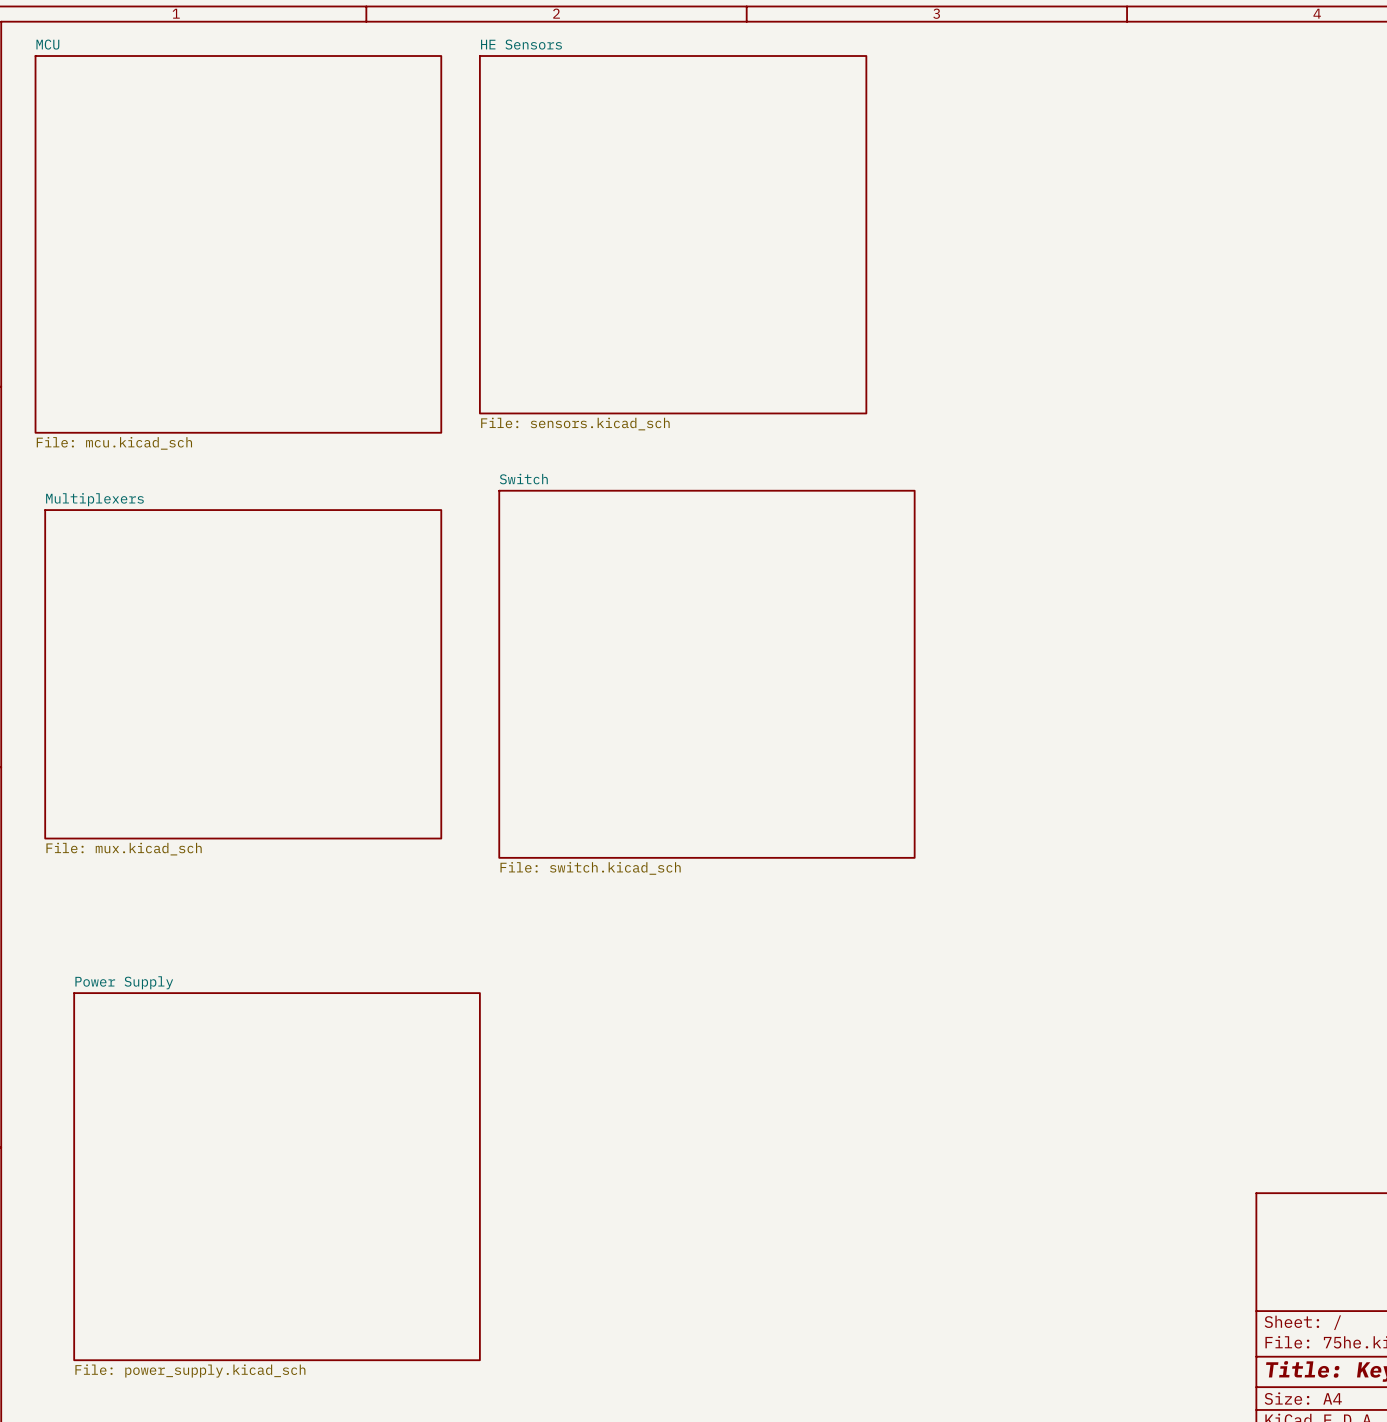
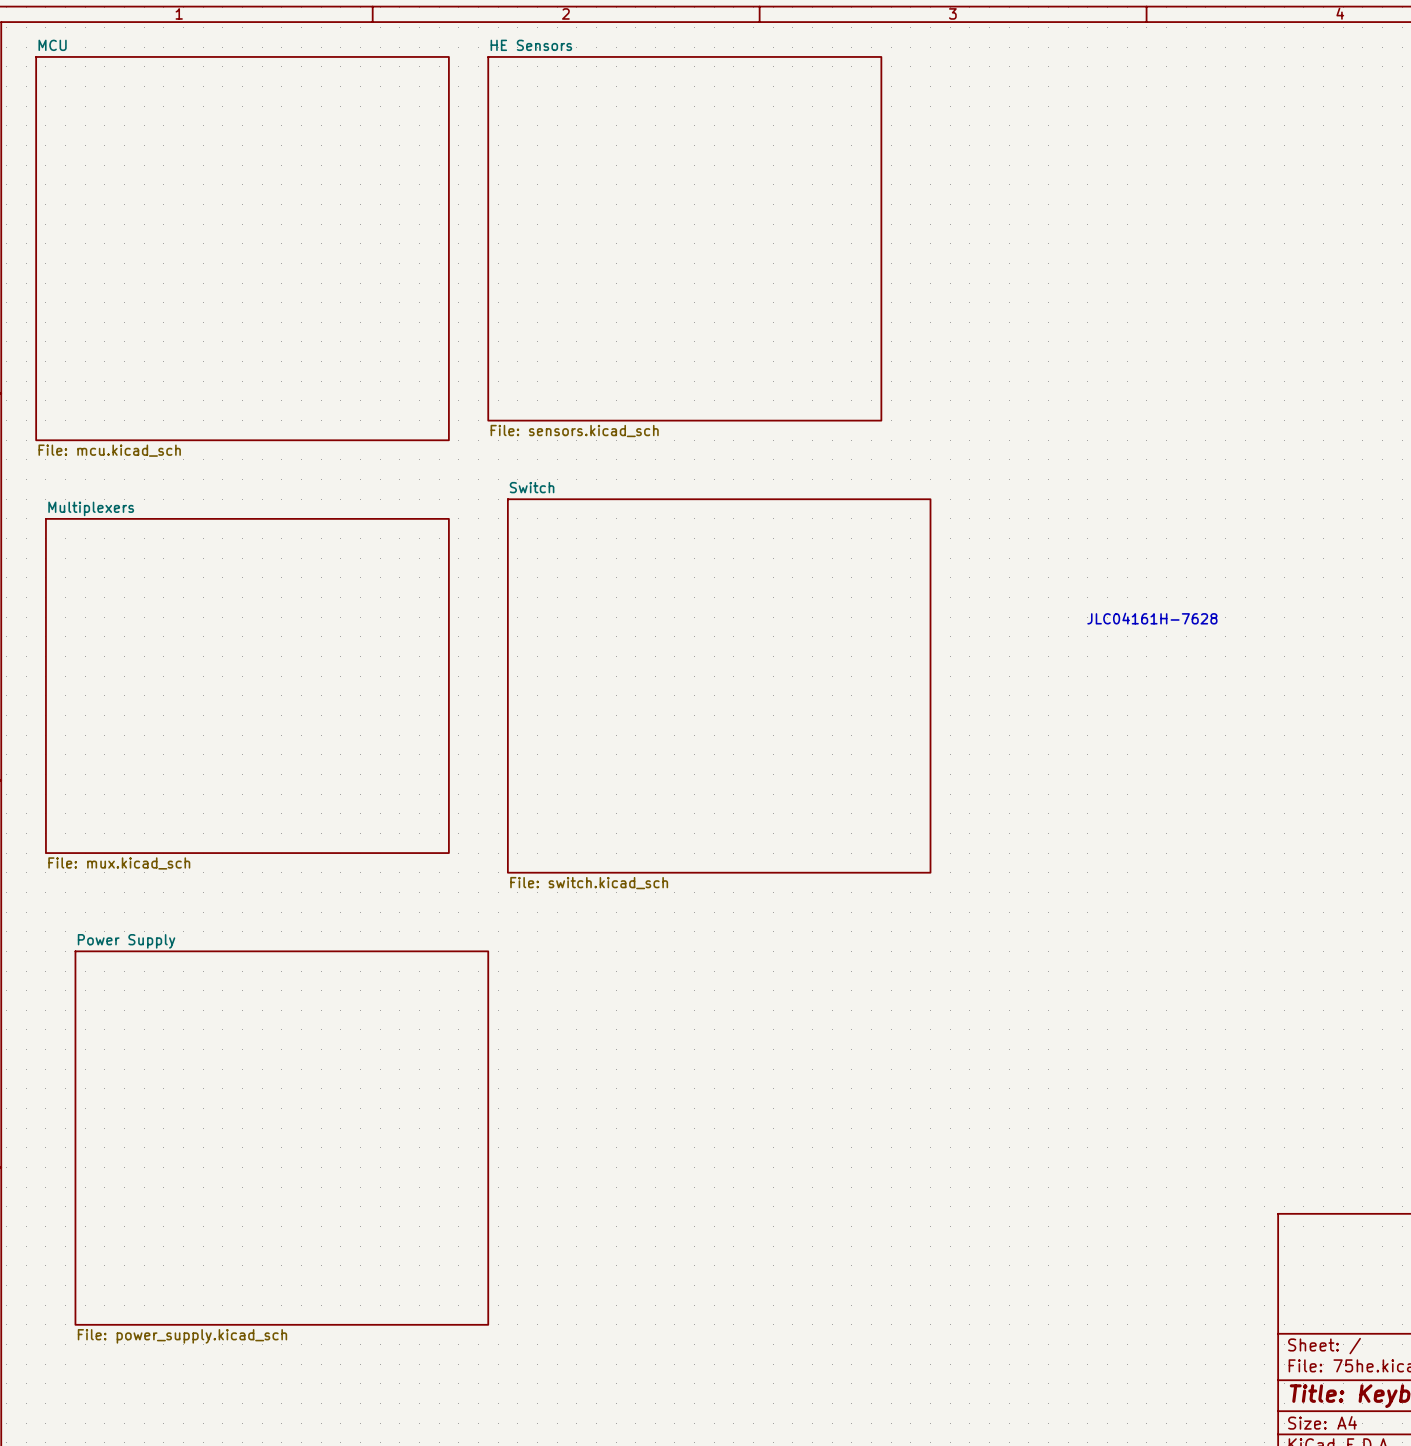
text: none -> JLC04161H-7628 (1152, 618)
sheet Power Supply position: (277, 1176) -> (281, 1138)

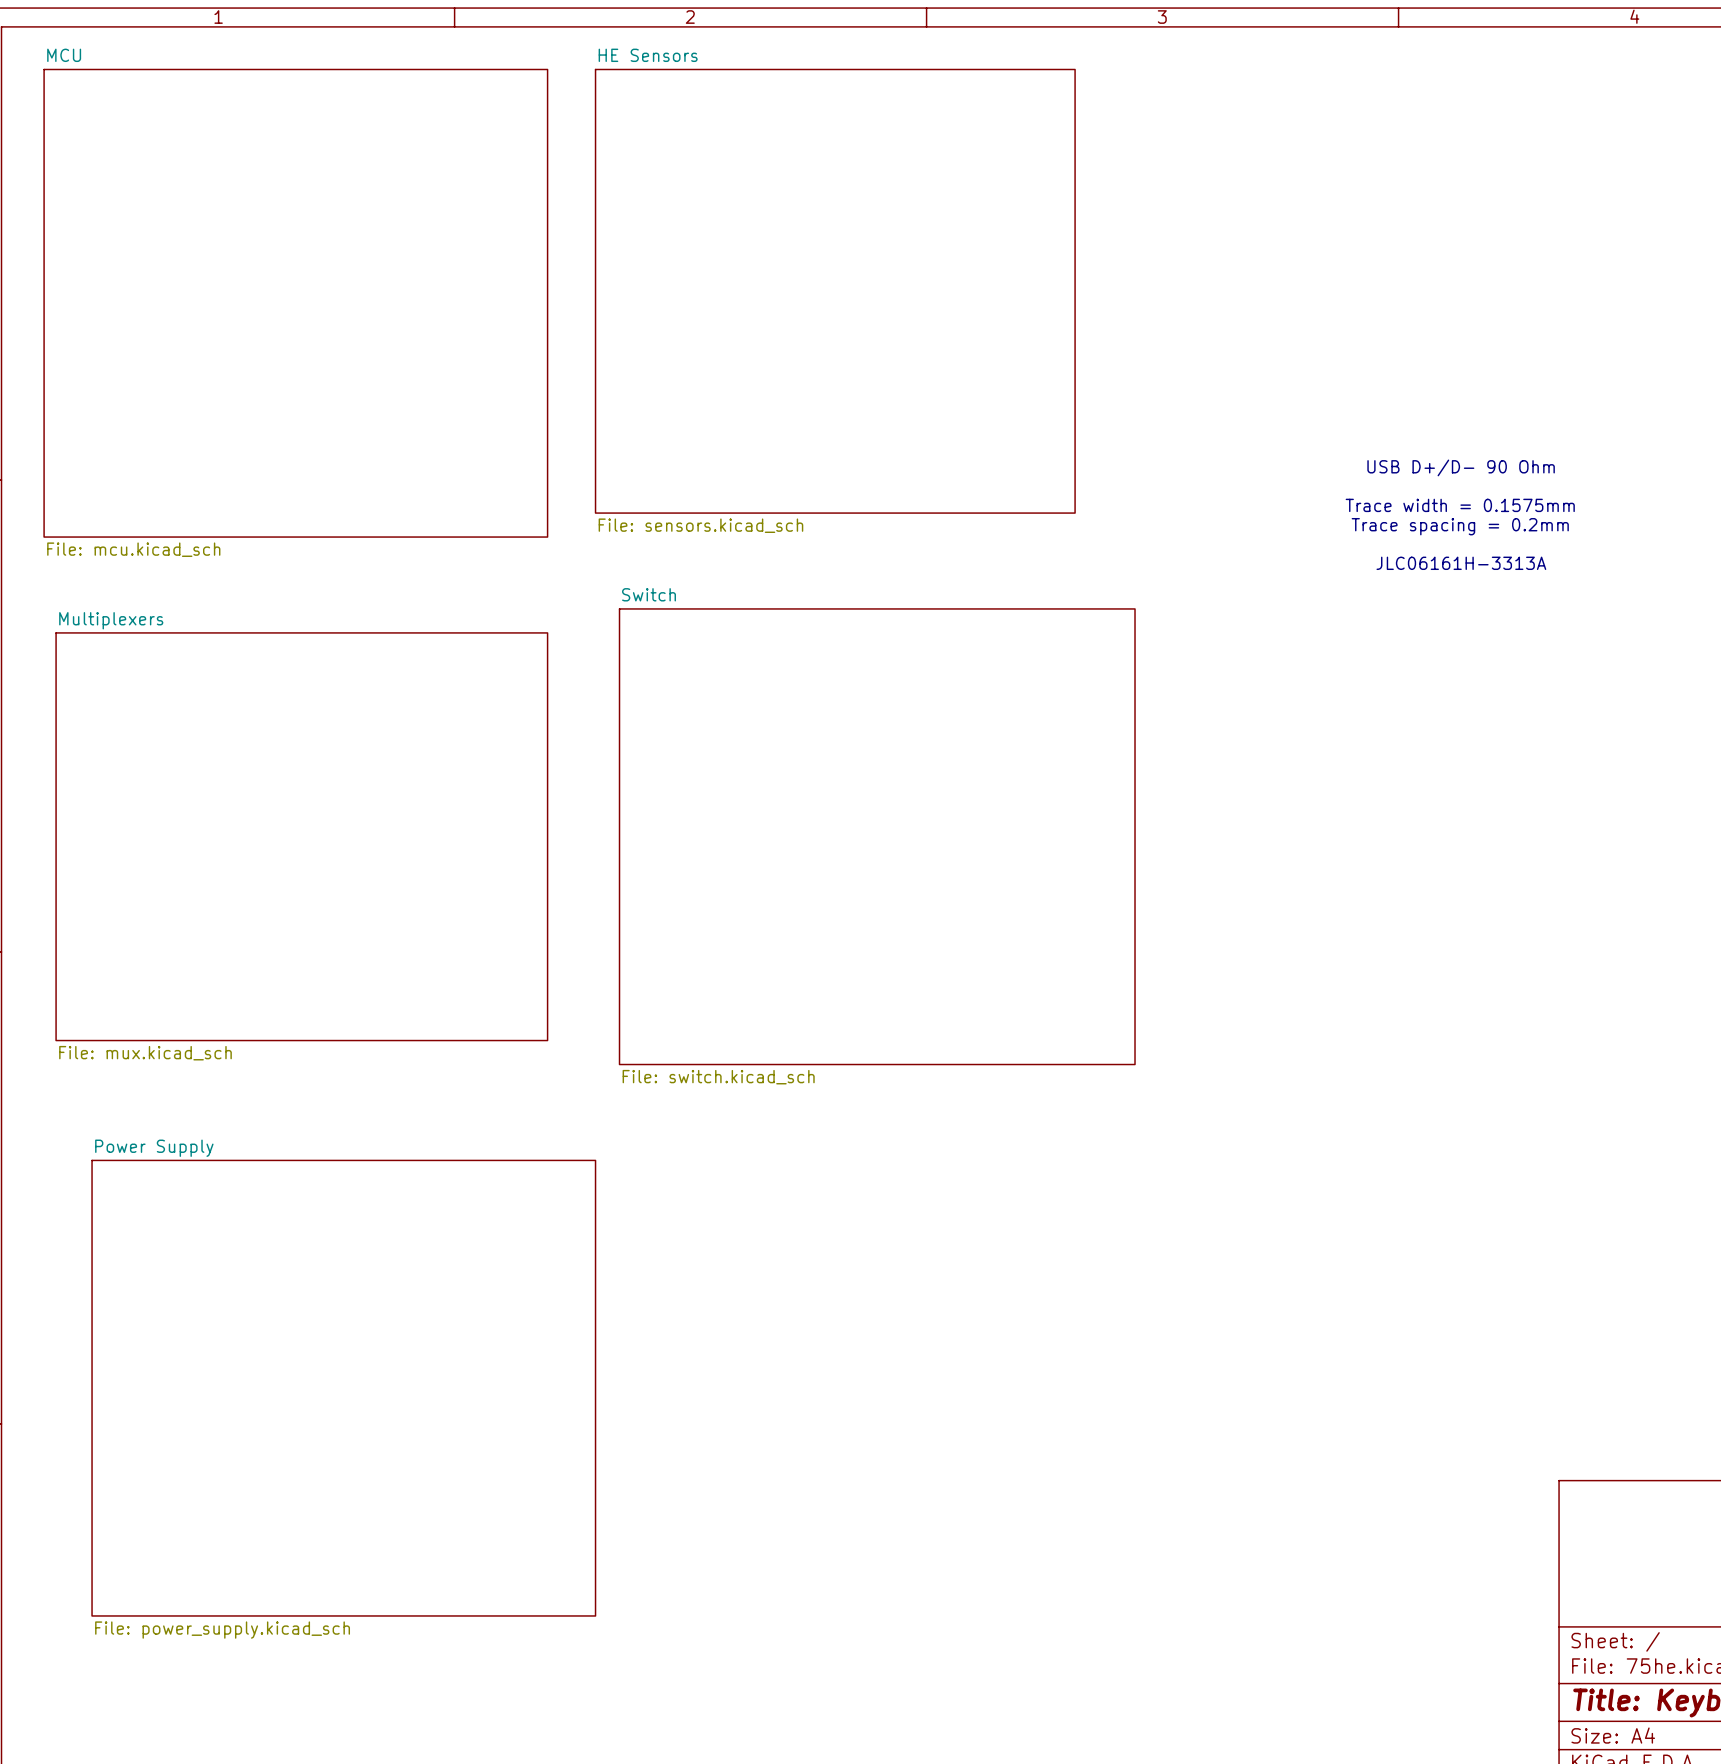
text: none -> USB D+/D- 90 Ohm (1461, 467)
text: none -> Trace width = 0.1575mm (1460, 505)
text: none -> Trace spacing = 0.2mm (1460, 526)
text: none -> JLC06161H-3313A (1461, 563)
text: JLC04161H-7628 (1152, 618) -> none

